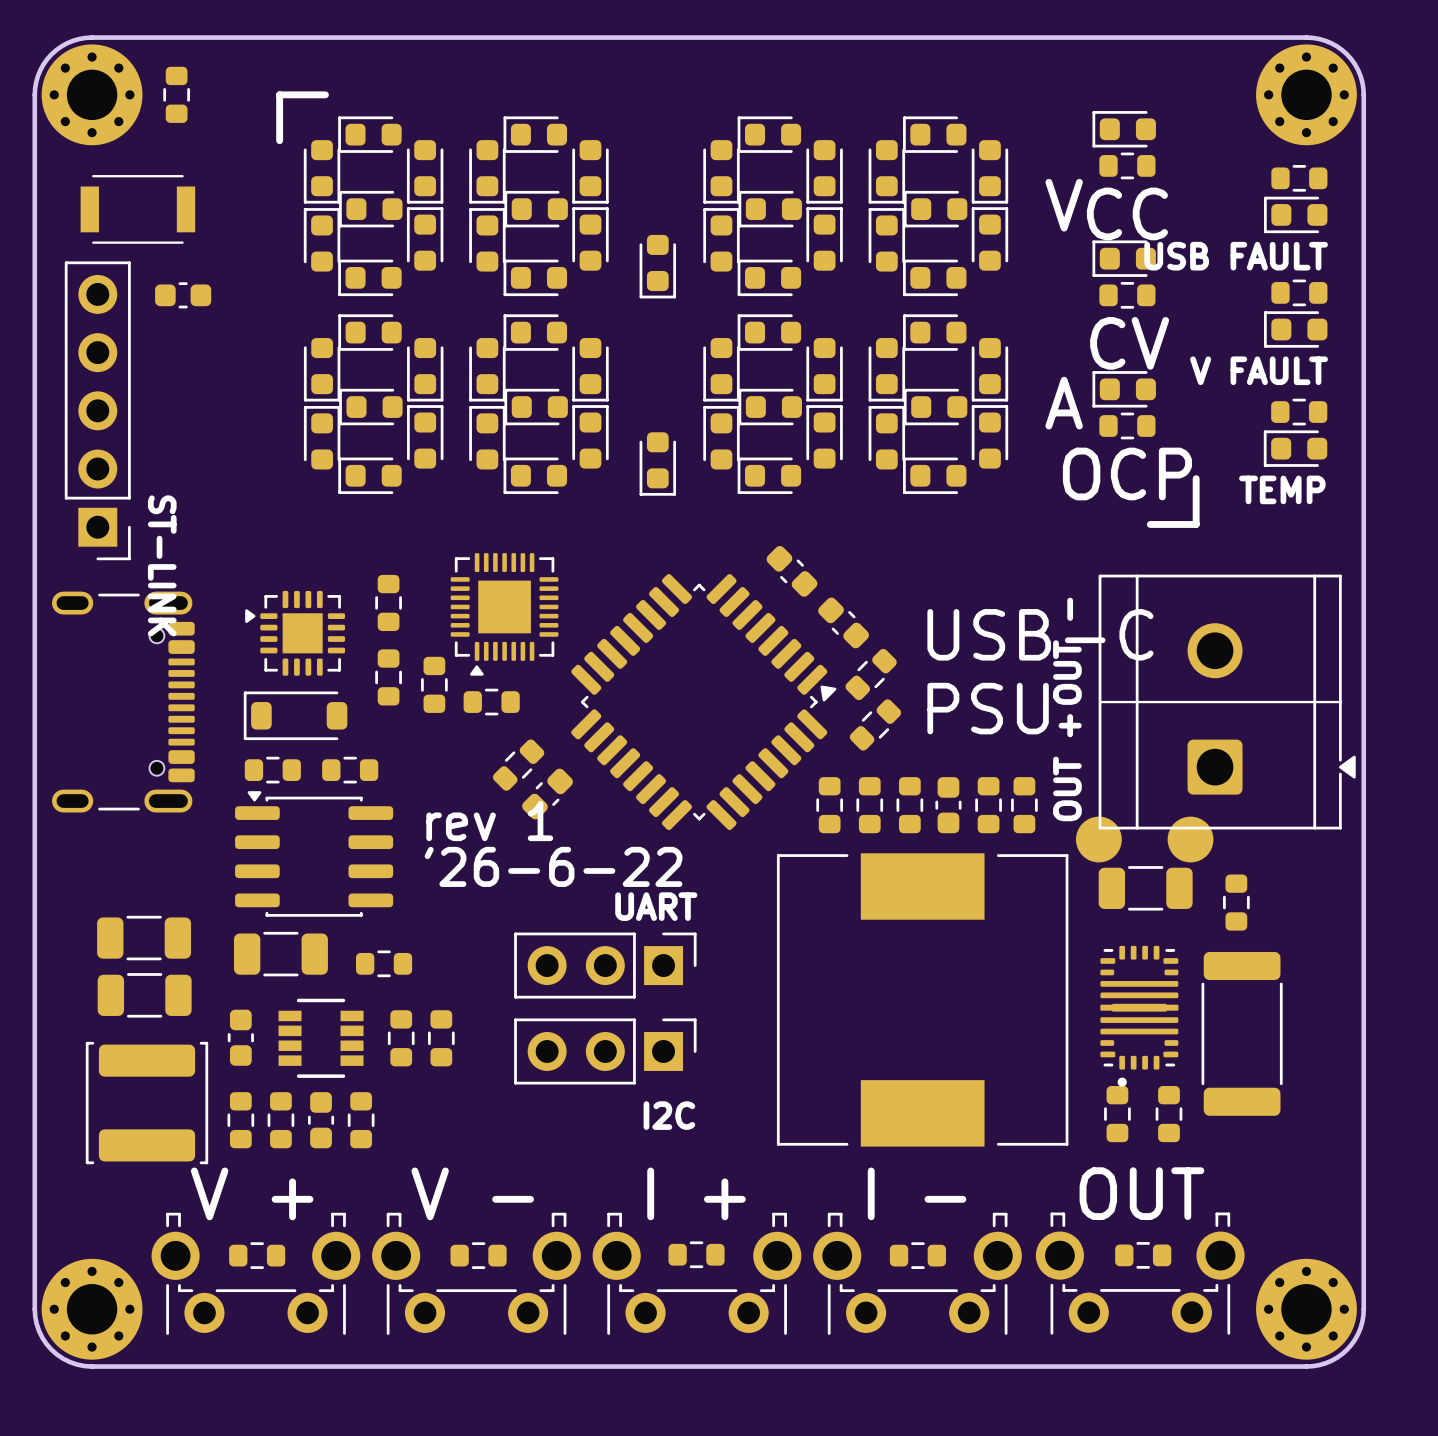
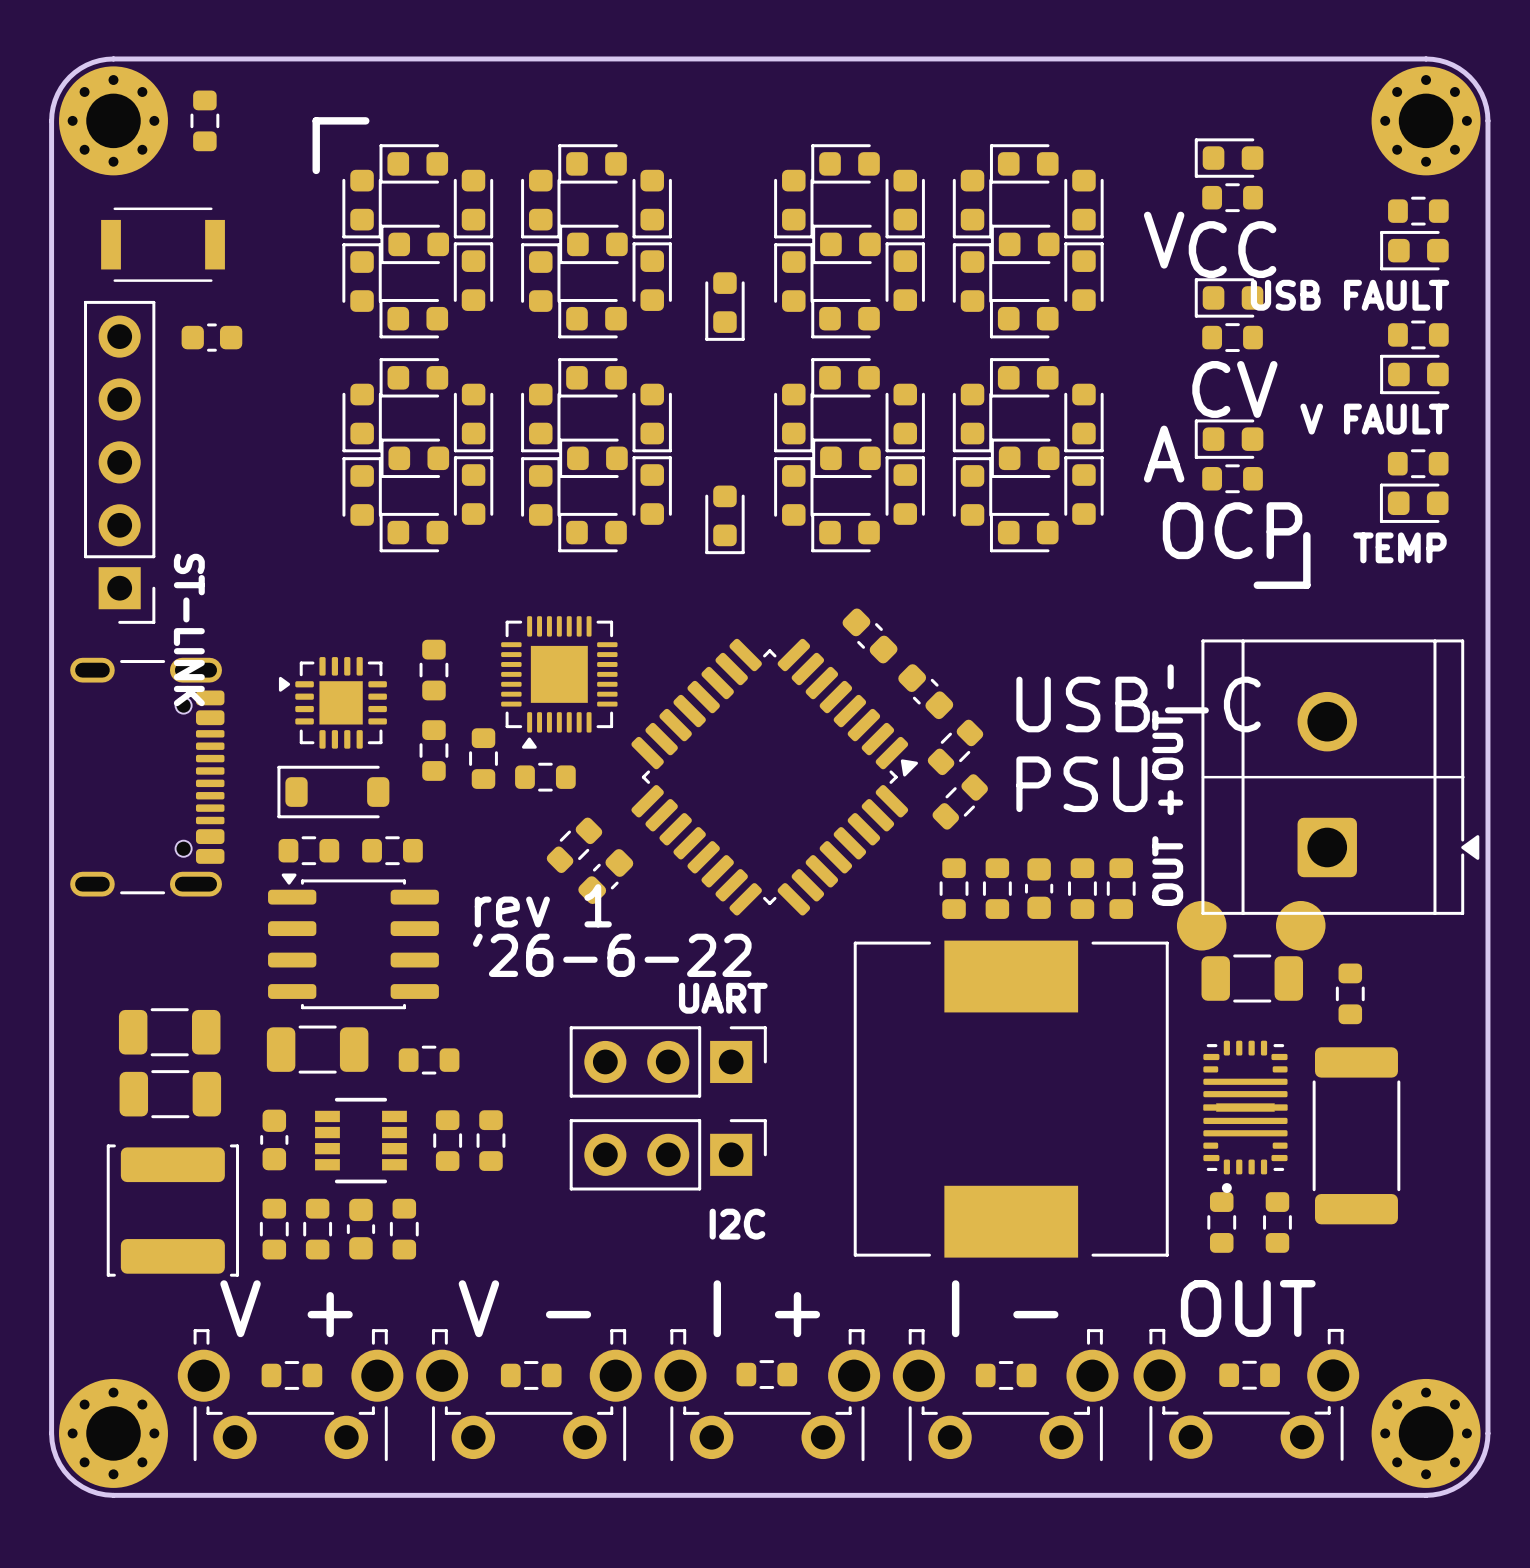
part: (829, 805) -> none

